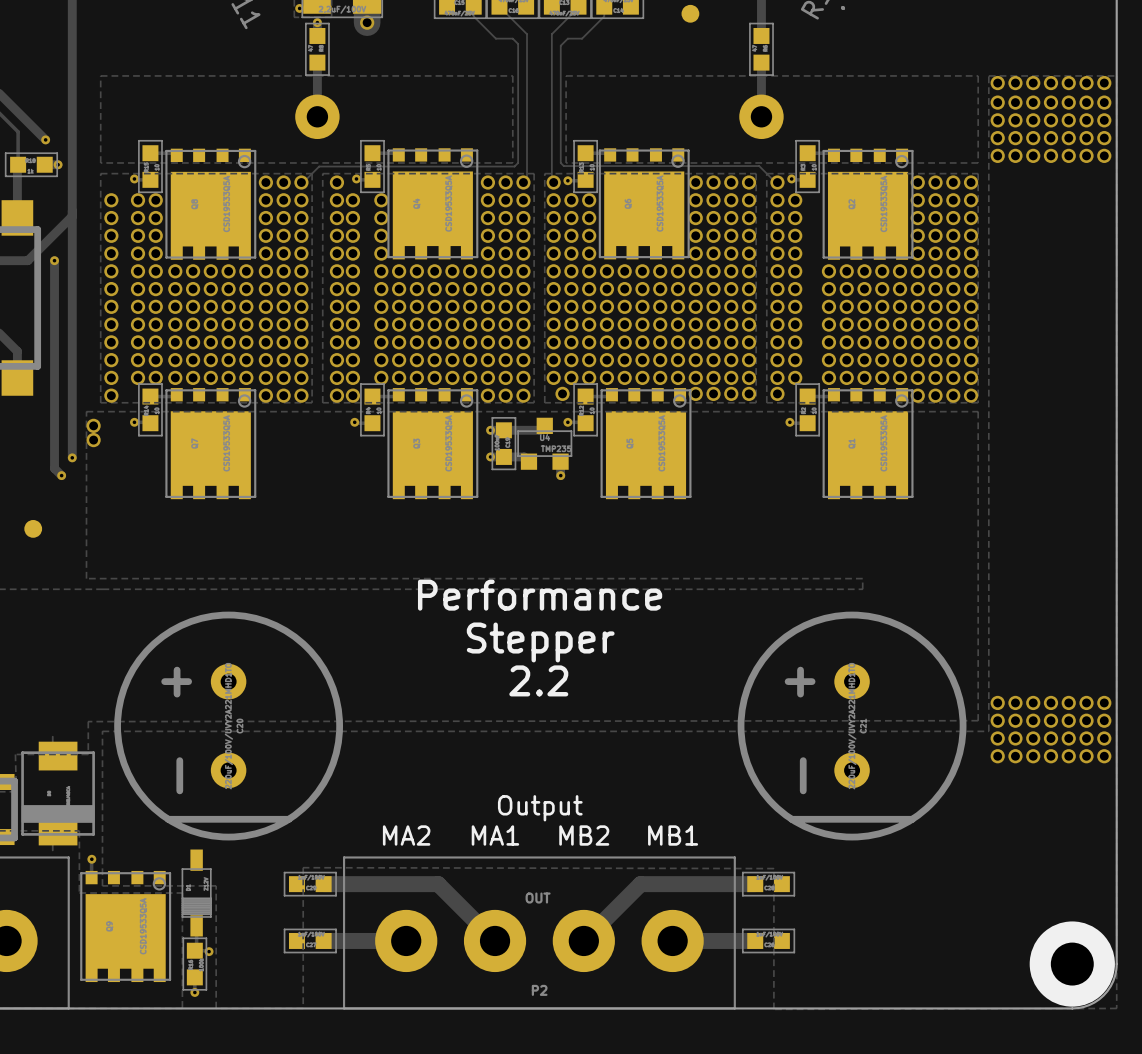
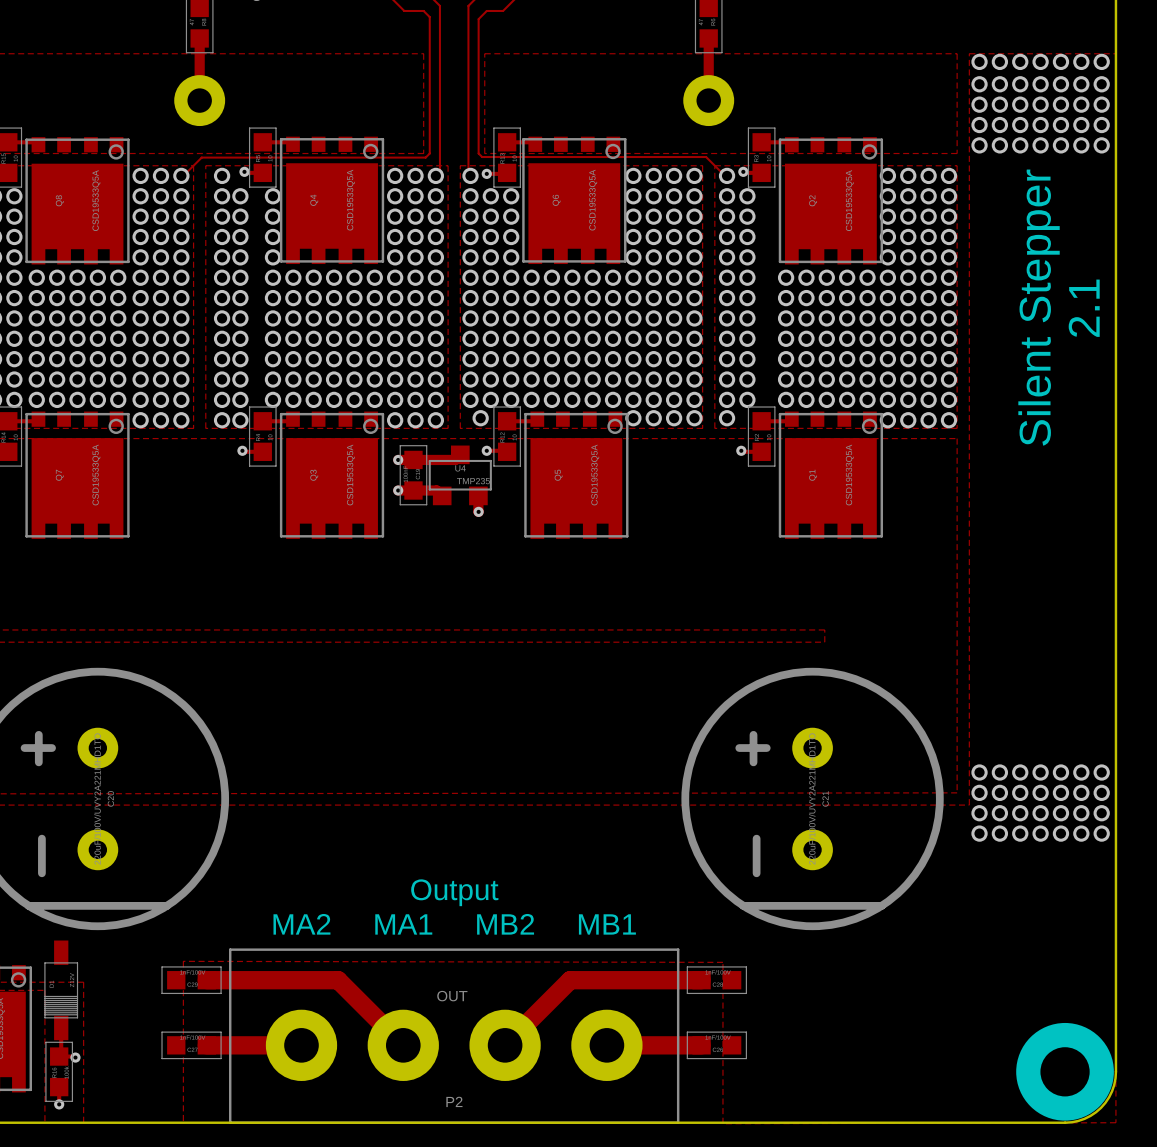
text: none -> Silent Stepper (1039, 307)
text: none -> 2.1 (1084, 308)
text: Performance (540, 595) -> none
text: Stepper (540, 642) -> none
text: 2.2 (538, 680) -> none

